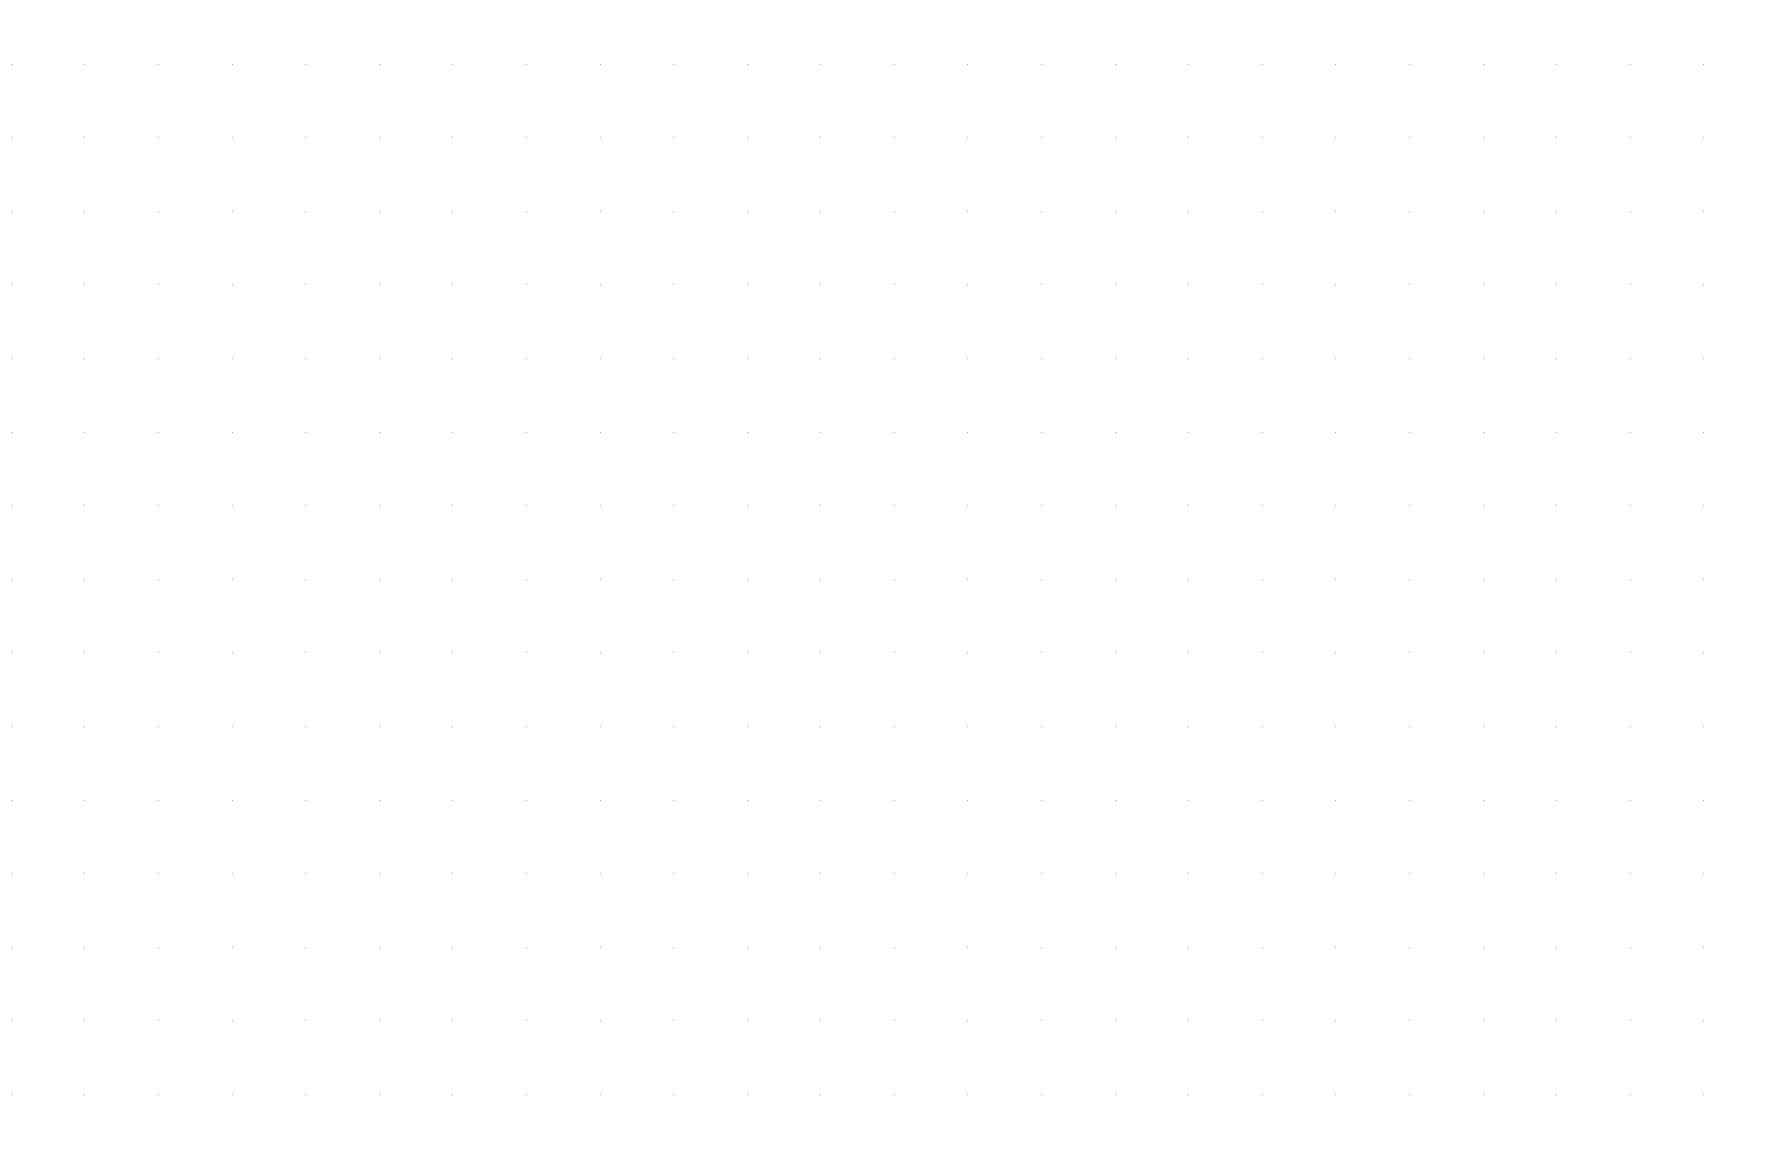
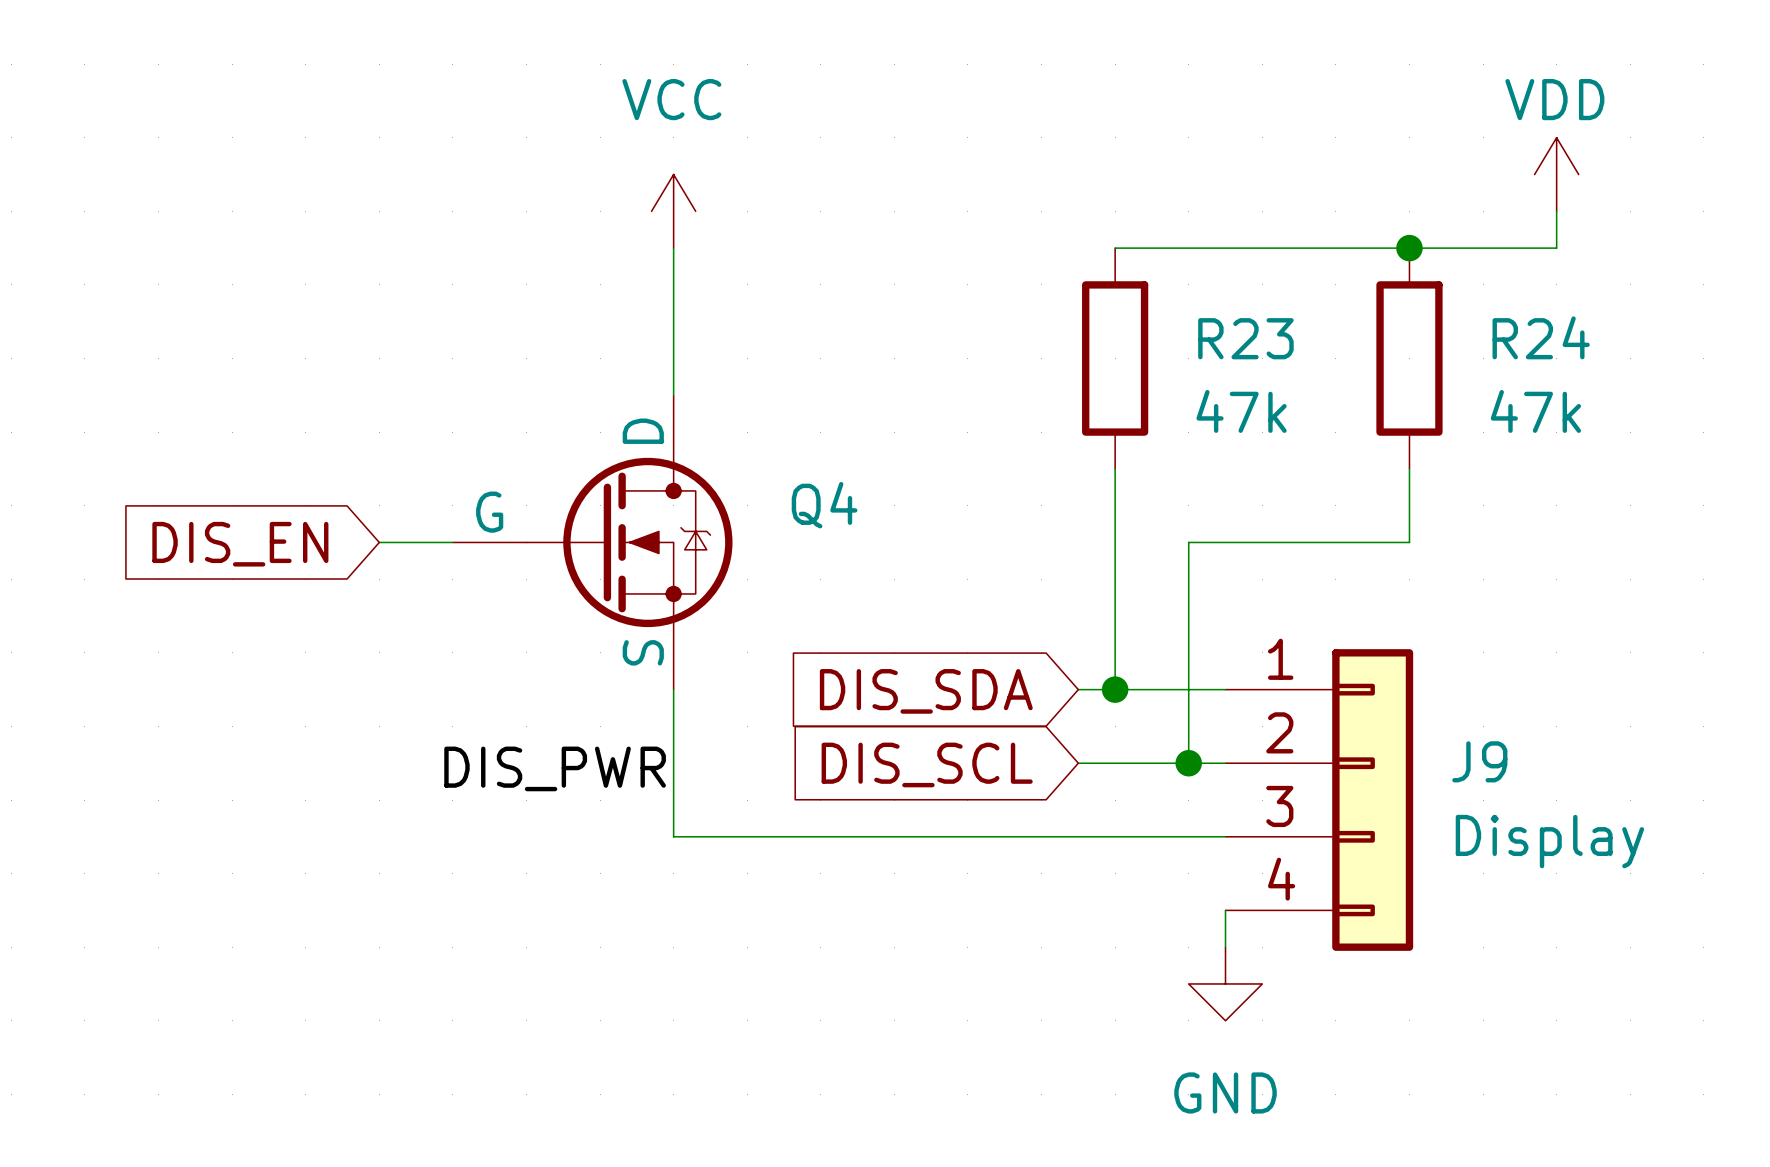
power symbol: none -> VDD (1556, 174)
power symbol: none -> VCC (673, 211)
wire: none -> (1556, 211) (1556, 248) (1115, 248)
wire: none -> (673, 248) (673, 395)
junction: none -> (1409, 248)
R23: none -> 47k (1115, 358)
R24: none -> 47k (1409, 358)
wire: none -> (1115, 468) (1115, 689)
wire: none -> (1409, 468) (1409, 542) (1188, 542) (1188, 763)
wire: none -> (379, 542) (452, 542)
Q4: none -> (592, 542)
global label: none -> DIS_EN (240, 544)
wire: none -> (673, 689) (673, 836) (1225, 836)
wire: none -> (1078, 689) (1225, 689)
junction: none -> (1115, 689)
global label: none -> DIS_SDA (926, 691)
wire: none -> (1078, 763) (1225, 763)
junction: none -> (1188, 763)
global label: none -> DIS_SCL (927, 764)
label: none -> DIS_PWR (555, 768)
J9: none -> Display (1319, 800)
wire: none -> (1225, 910) (1225, 947)
power symbol: none -> GND (1225, 983)

